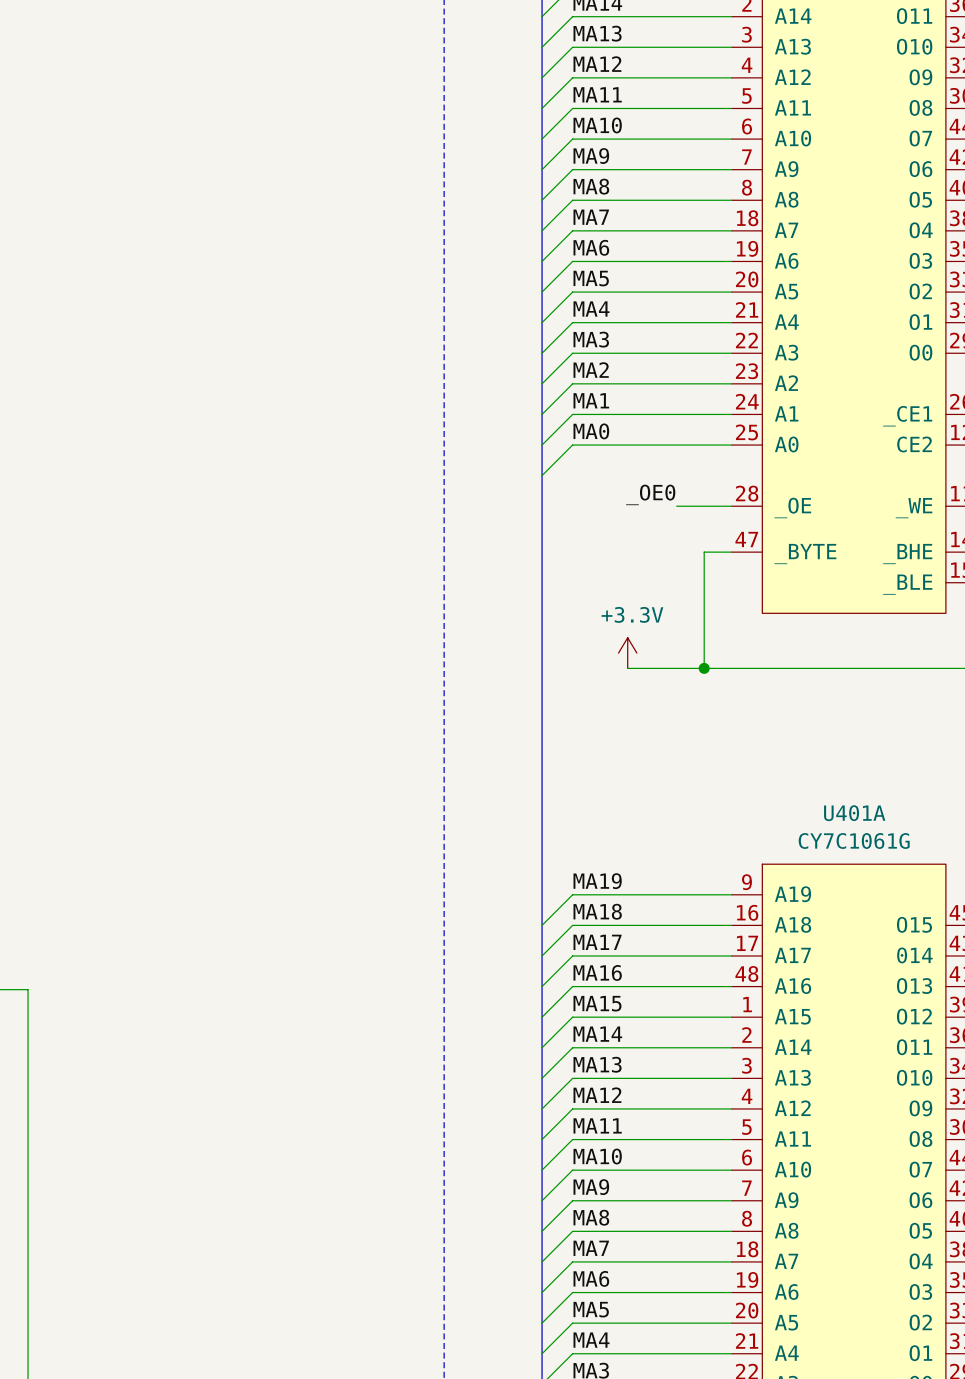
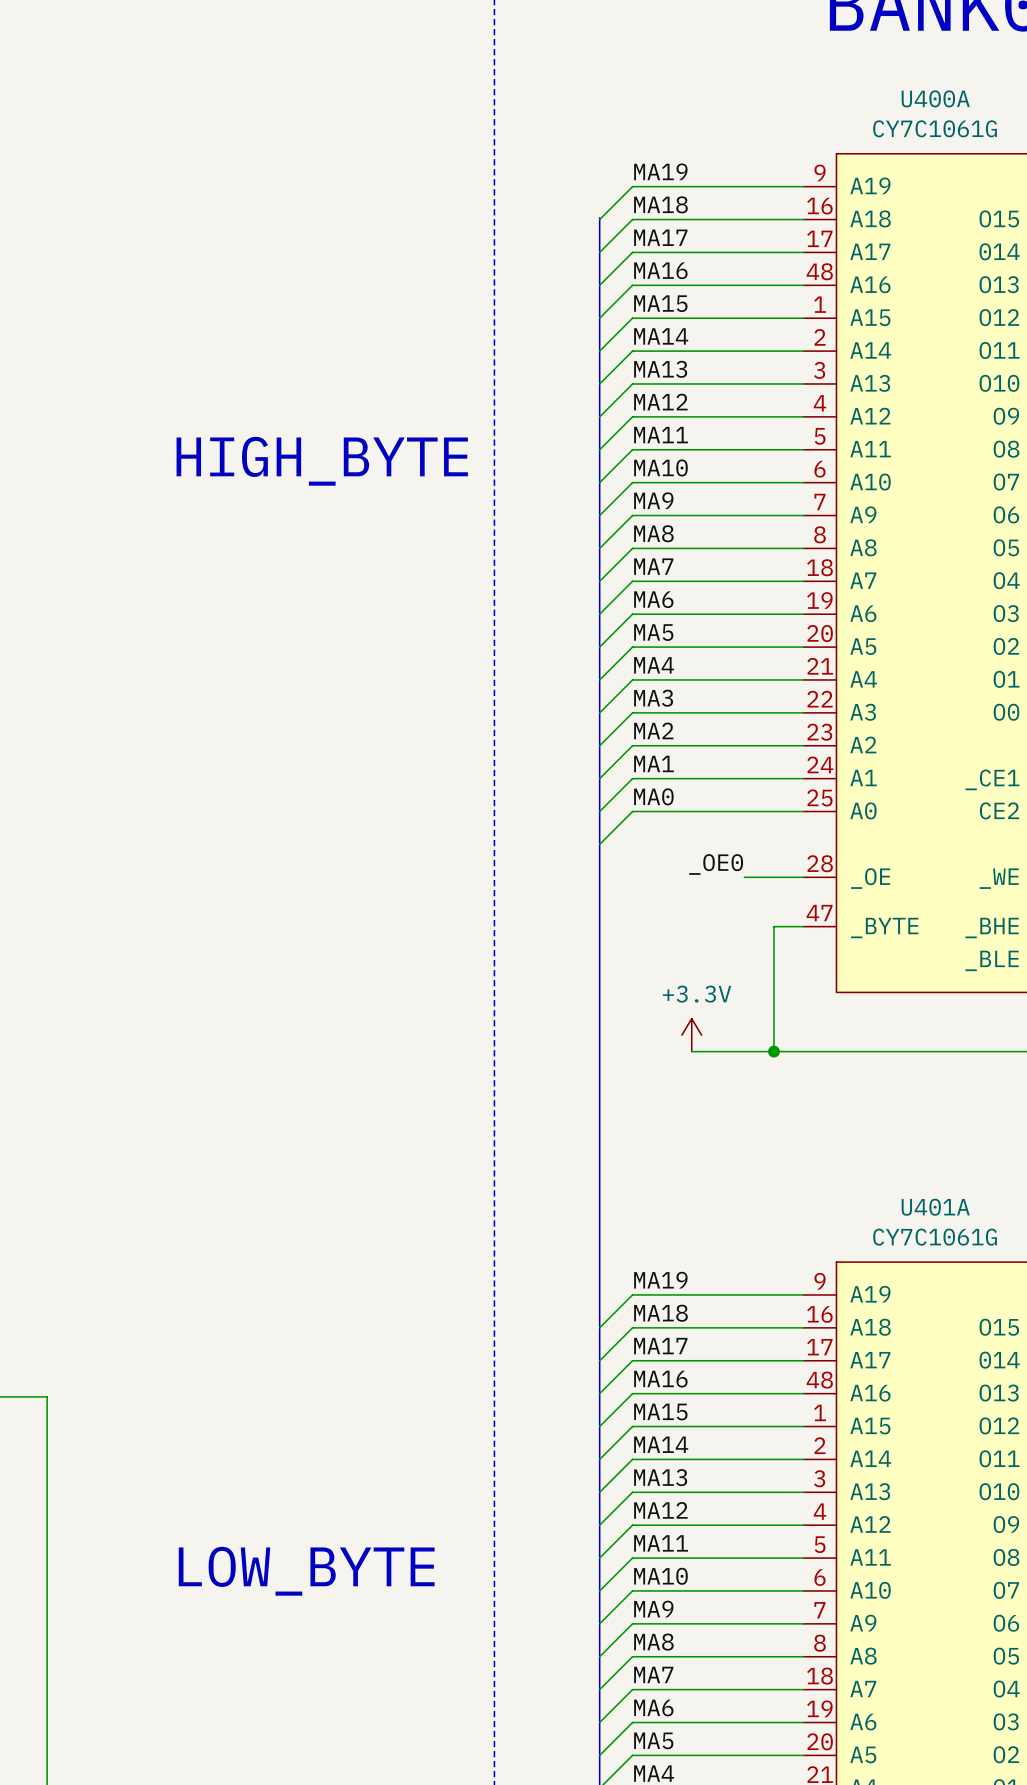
text: none -> HIGH_BYTE (322, 461)
text: none -> LOW_BYTE (306, 1571)

